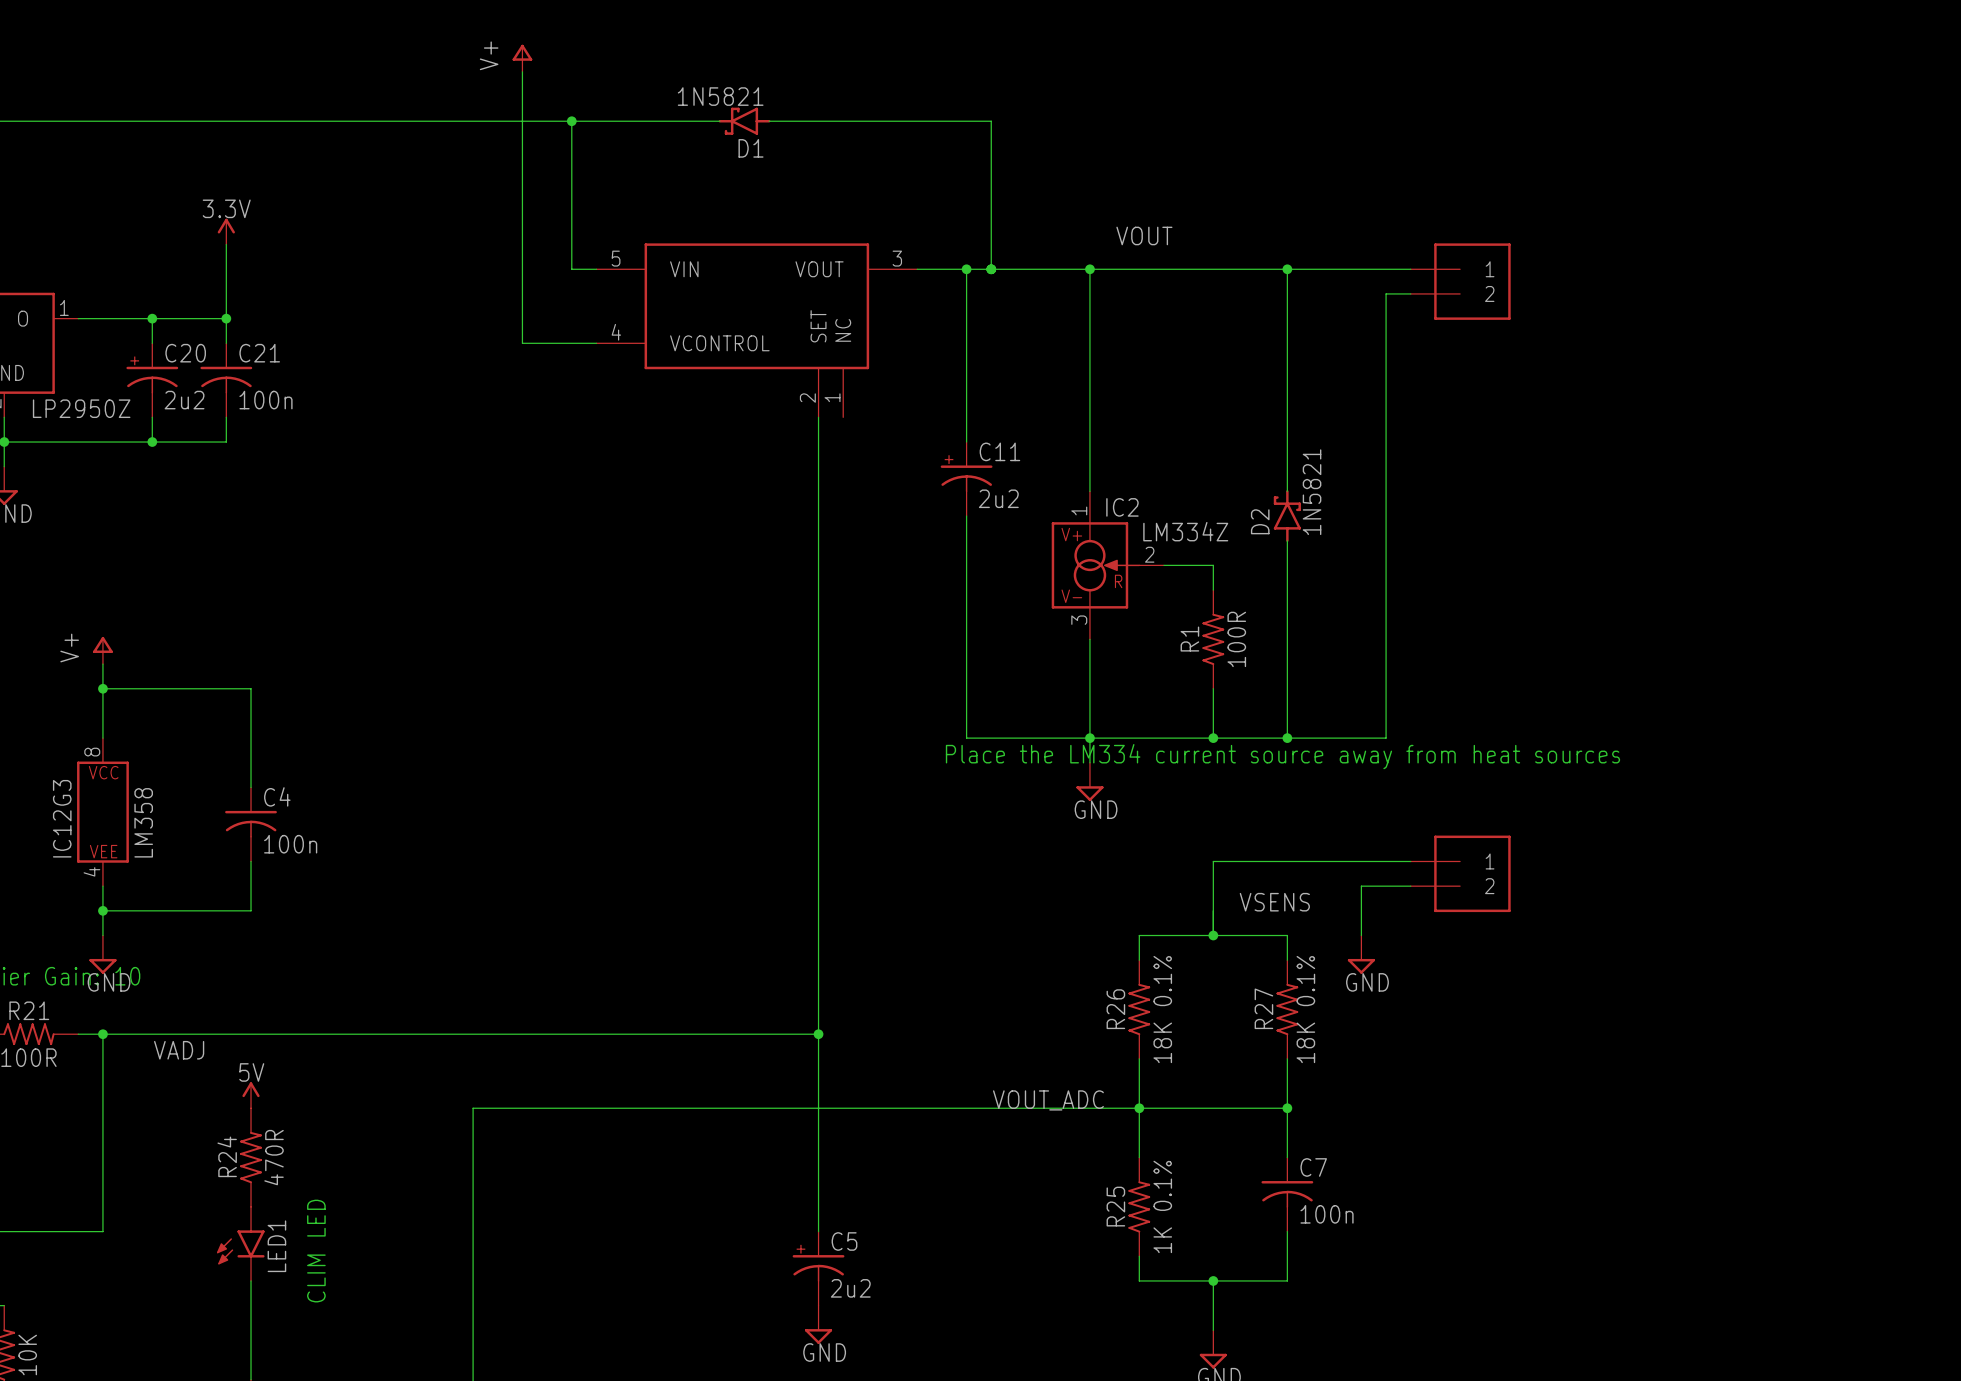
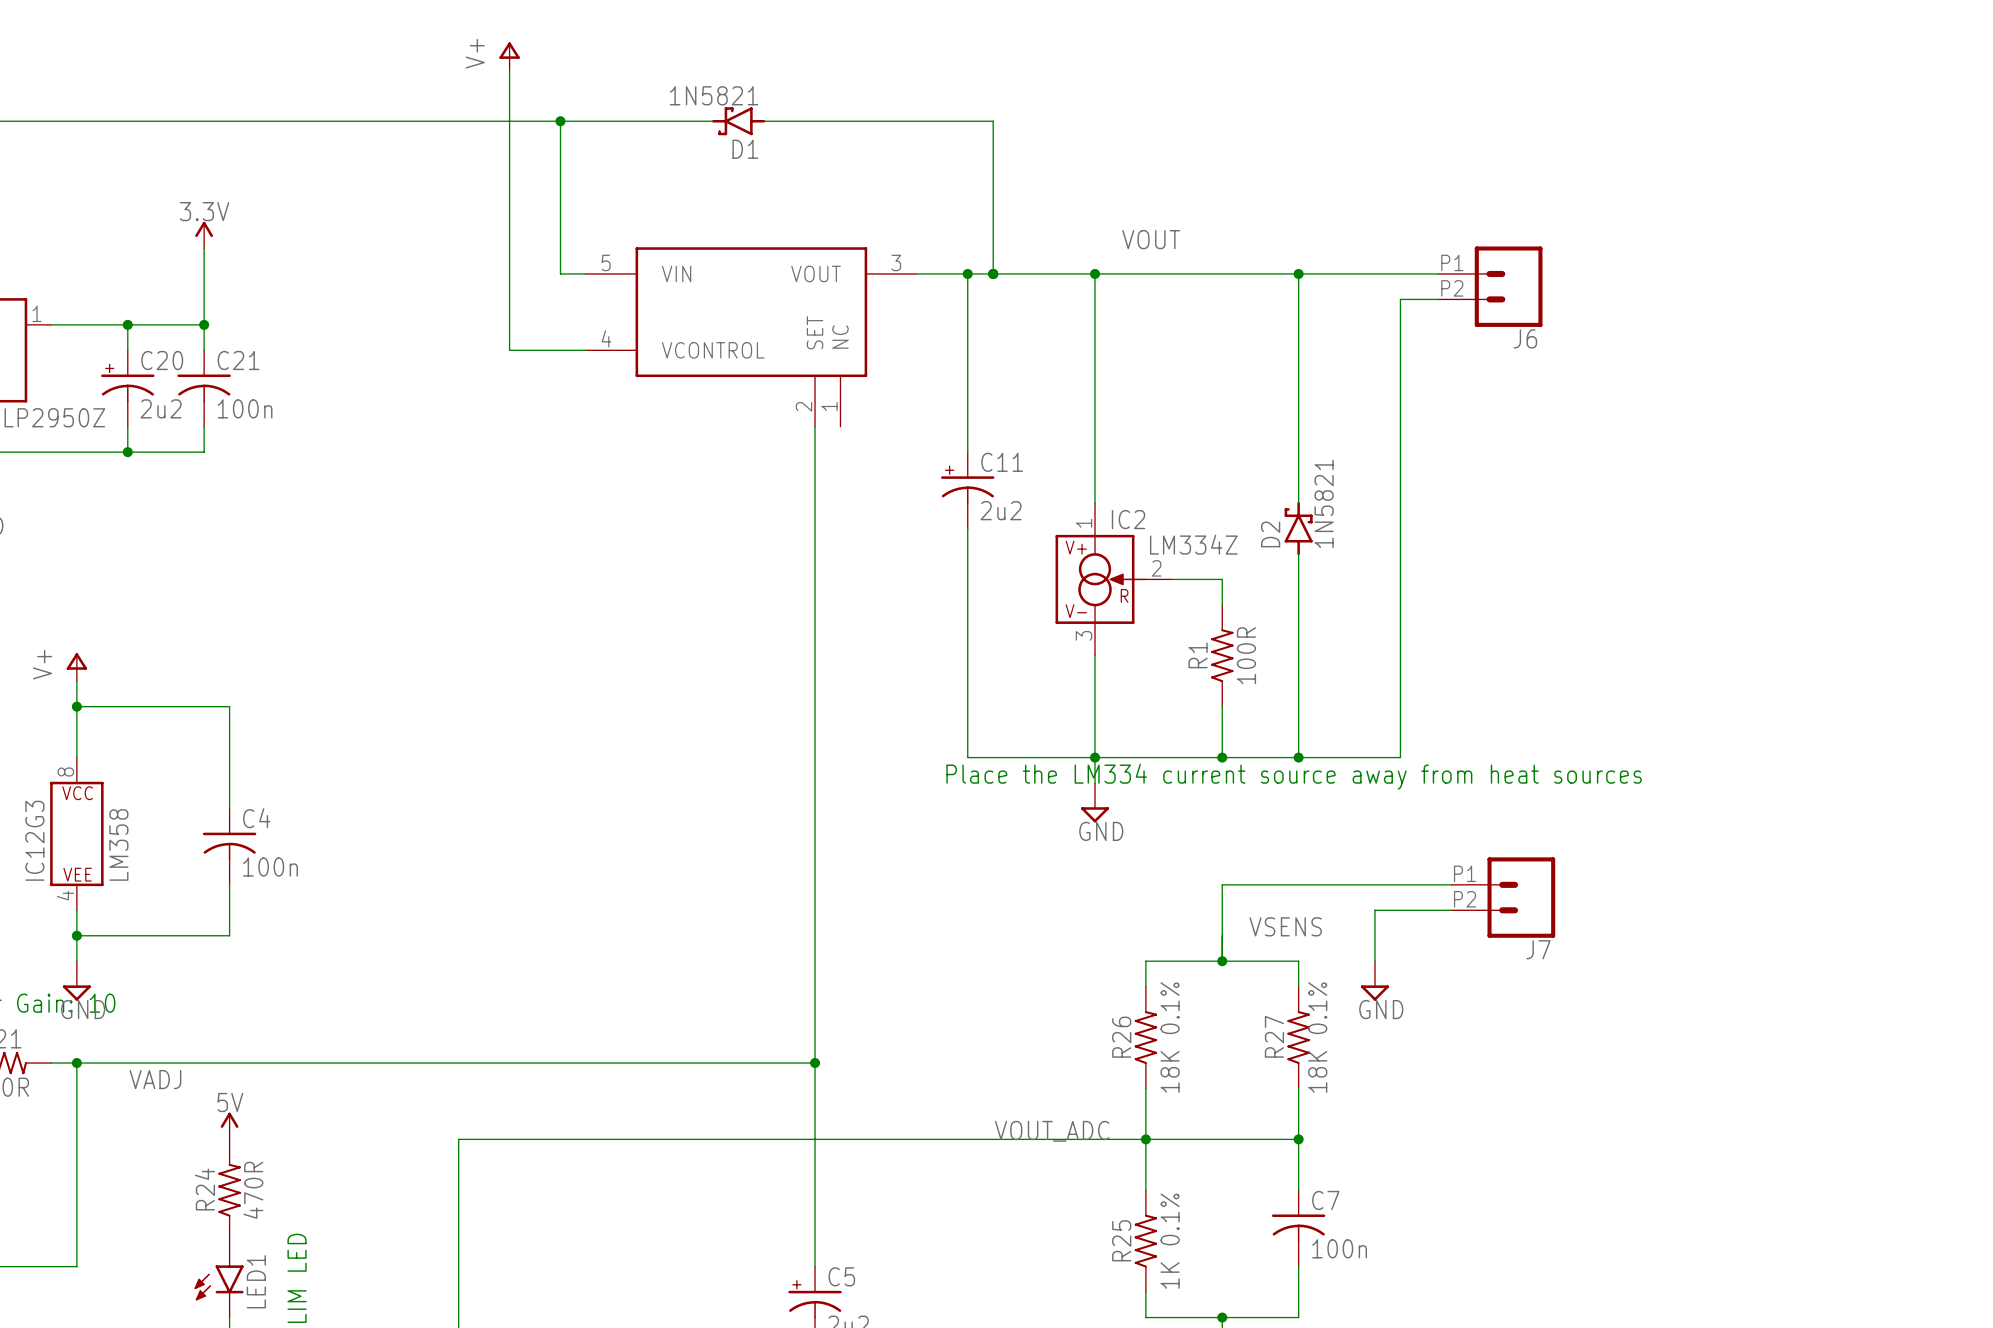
part: (1460, 281) -> none
J6: none -> (1490, 286)
part: (1460, 873) -> none
J7: none -> (1503, 897)

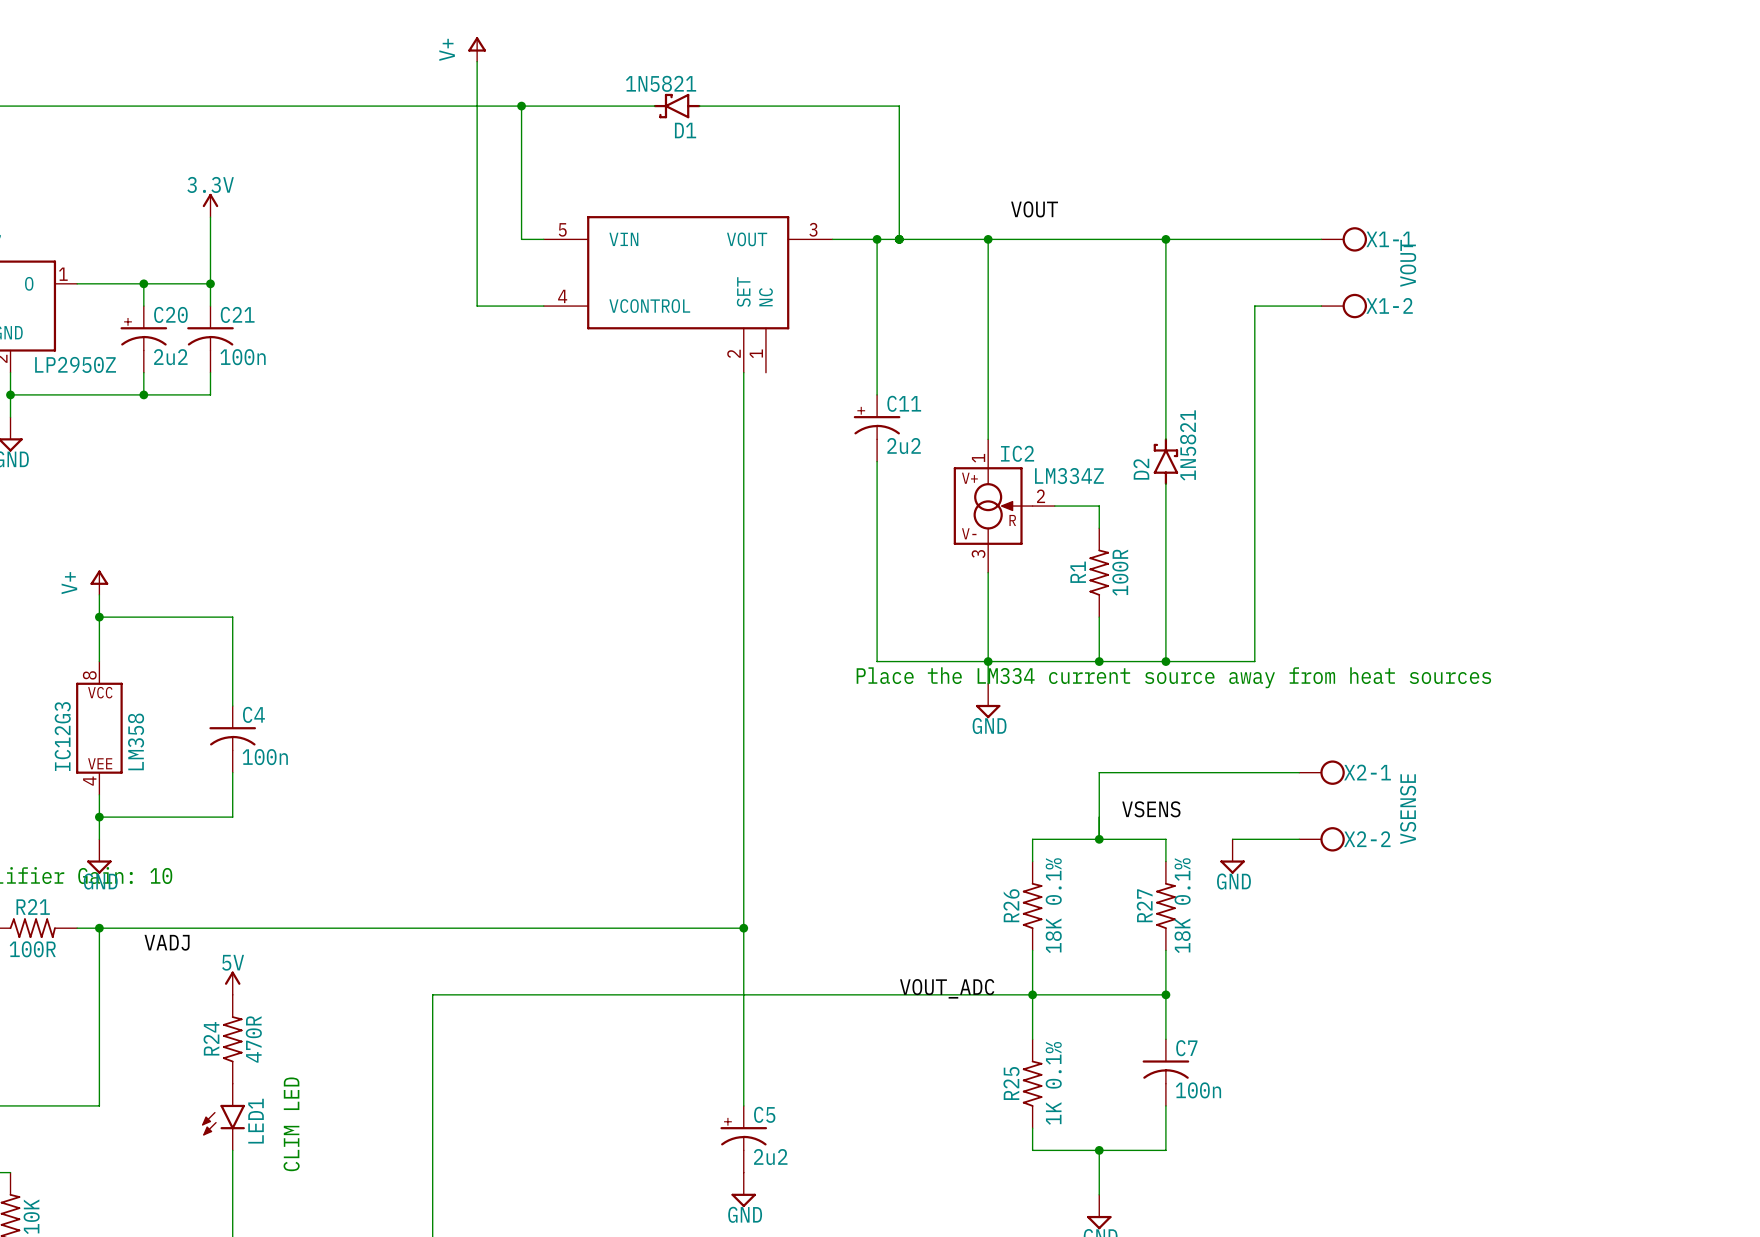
X1-1: none -> (1344, 239)
J6: (1490, 286) -> none
wire: (1438, 299) (1400, 299) (1400, 350) -> (1321, 306) (1254, 306)
X1-2: none -> VOUT (1344, 306)
X2-1: none -> (1322, 772)
J7: (1503, 897) -> none
wire: (1451, 910) (1374, 910) (1374, 961) -> (1299, 839) (1232, 839)
X2-2: none -> VSENSE (1322, 839)

